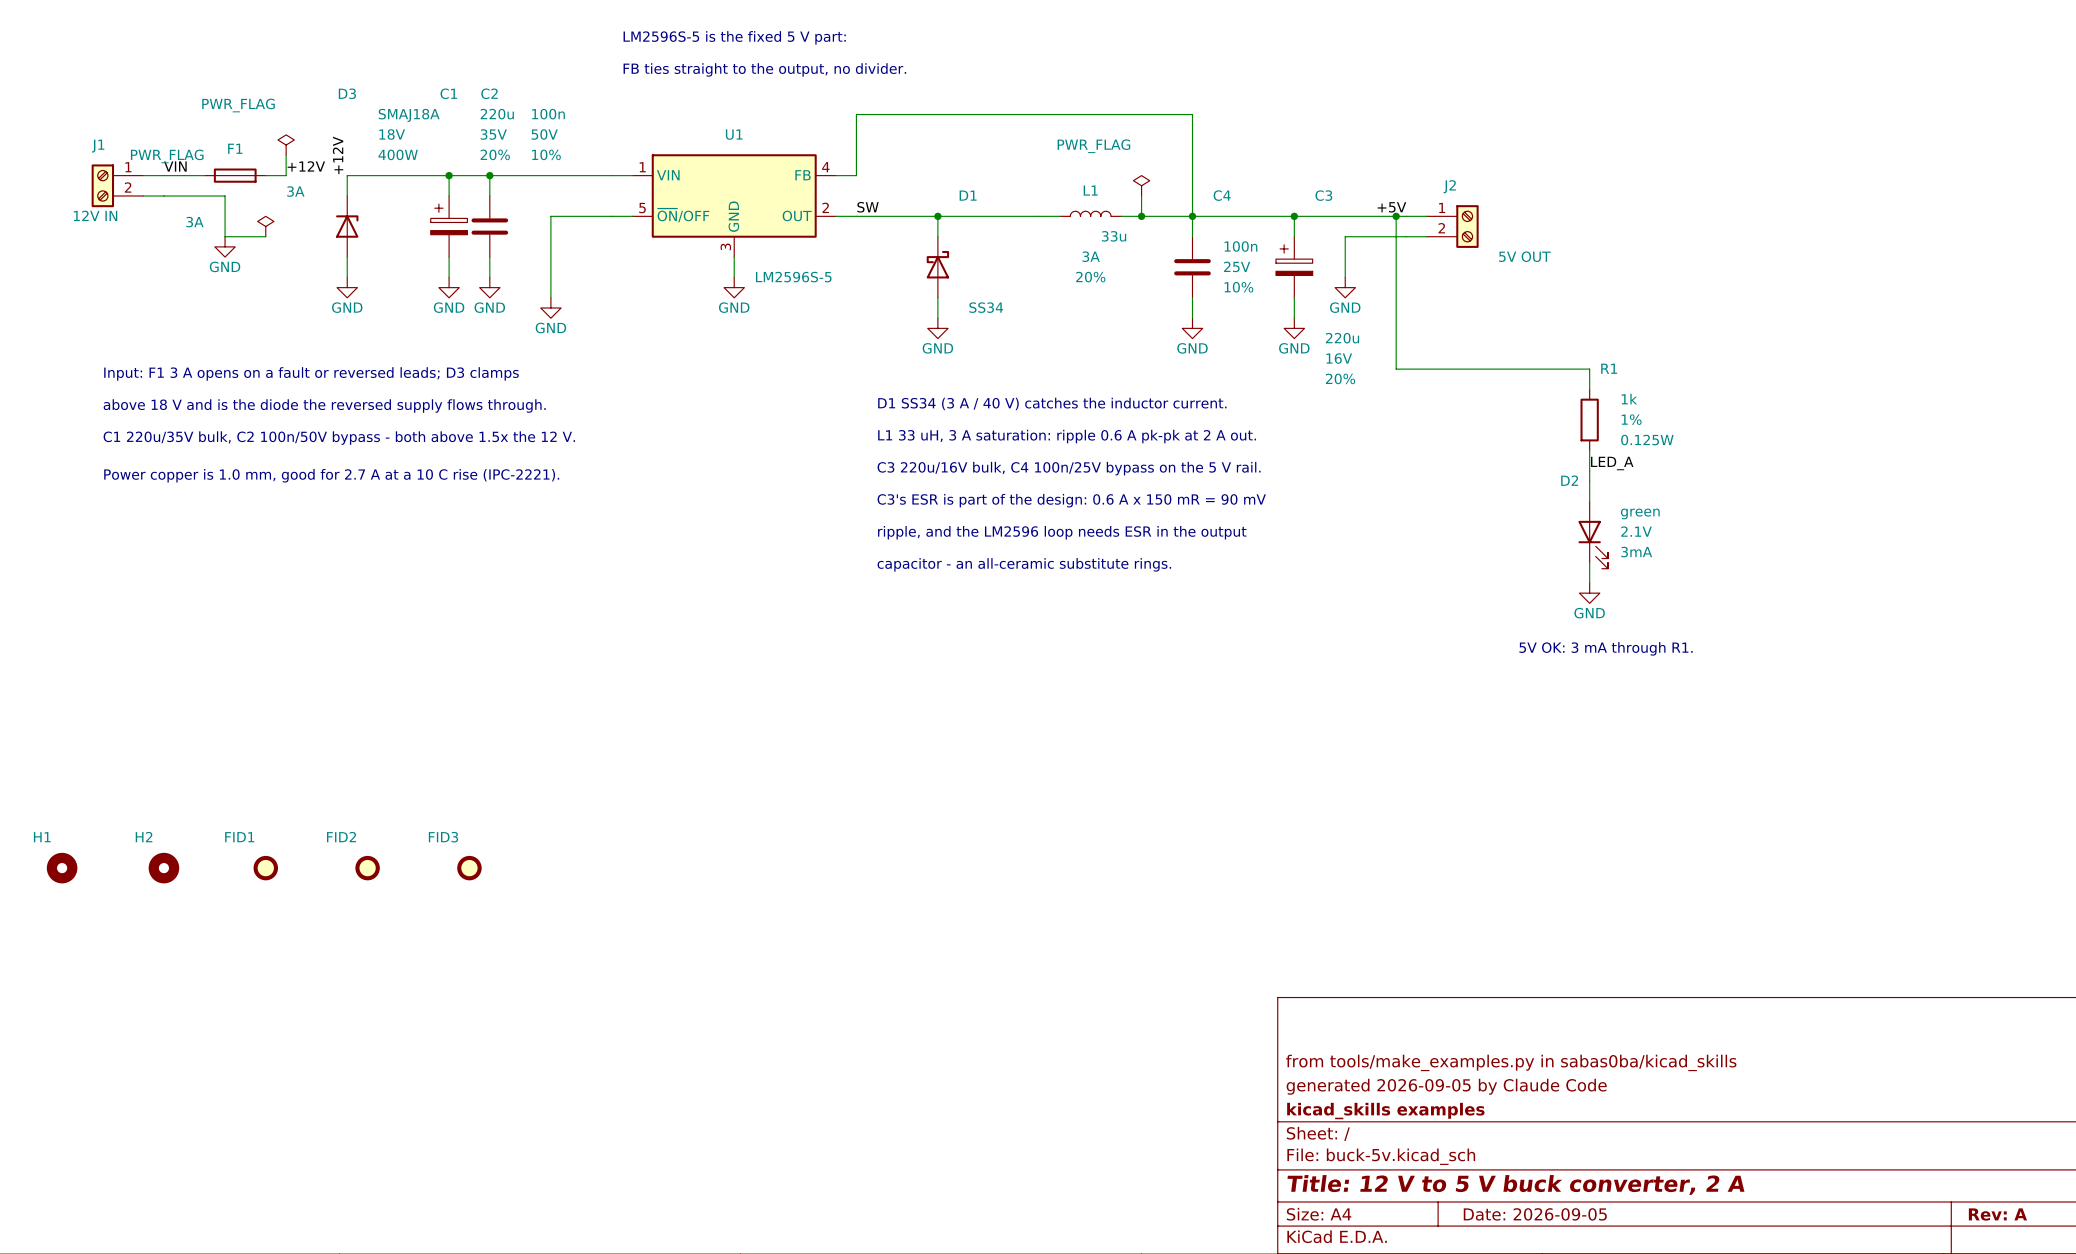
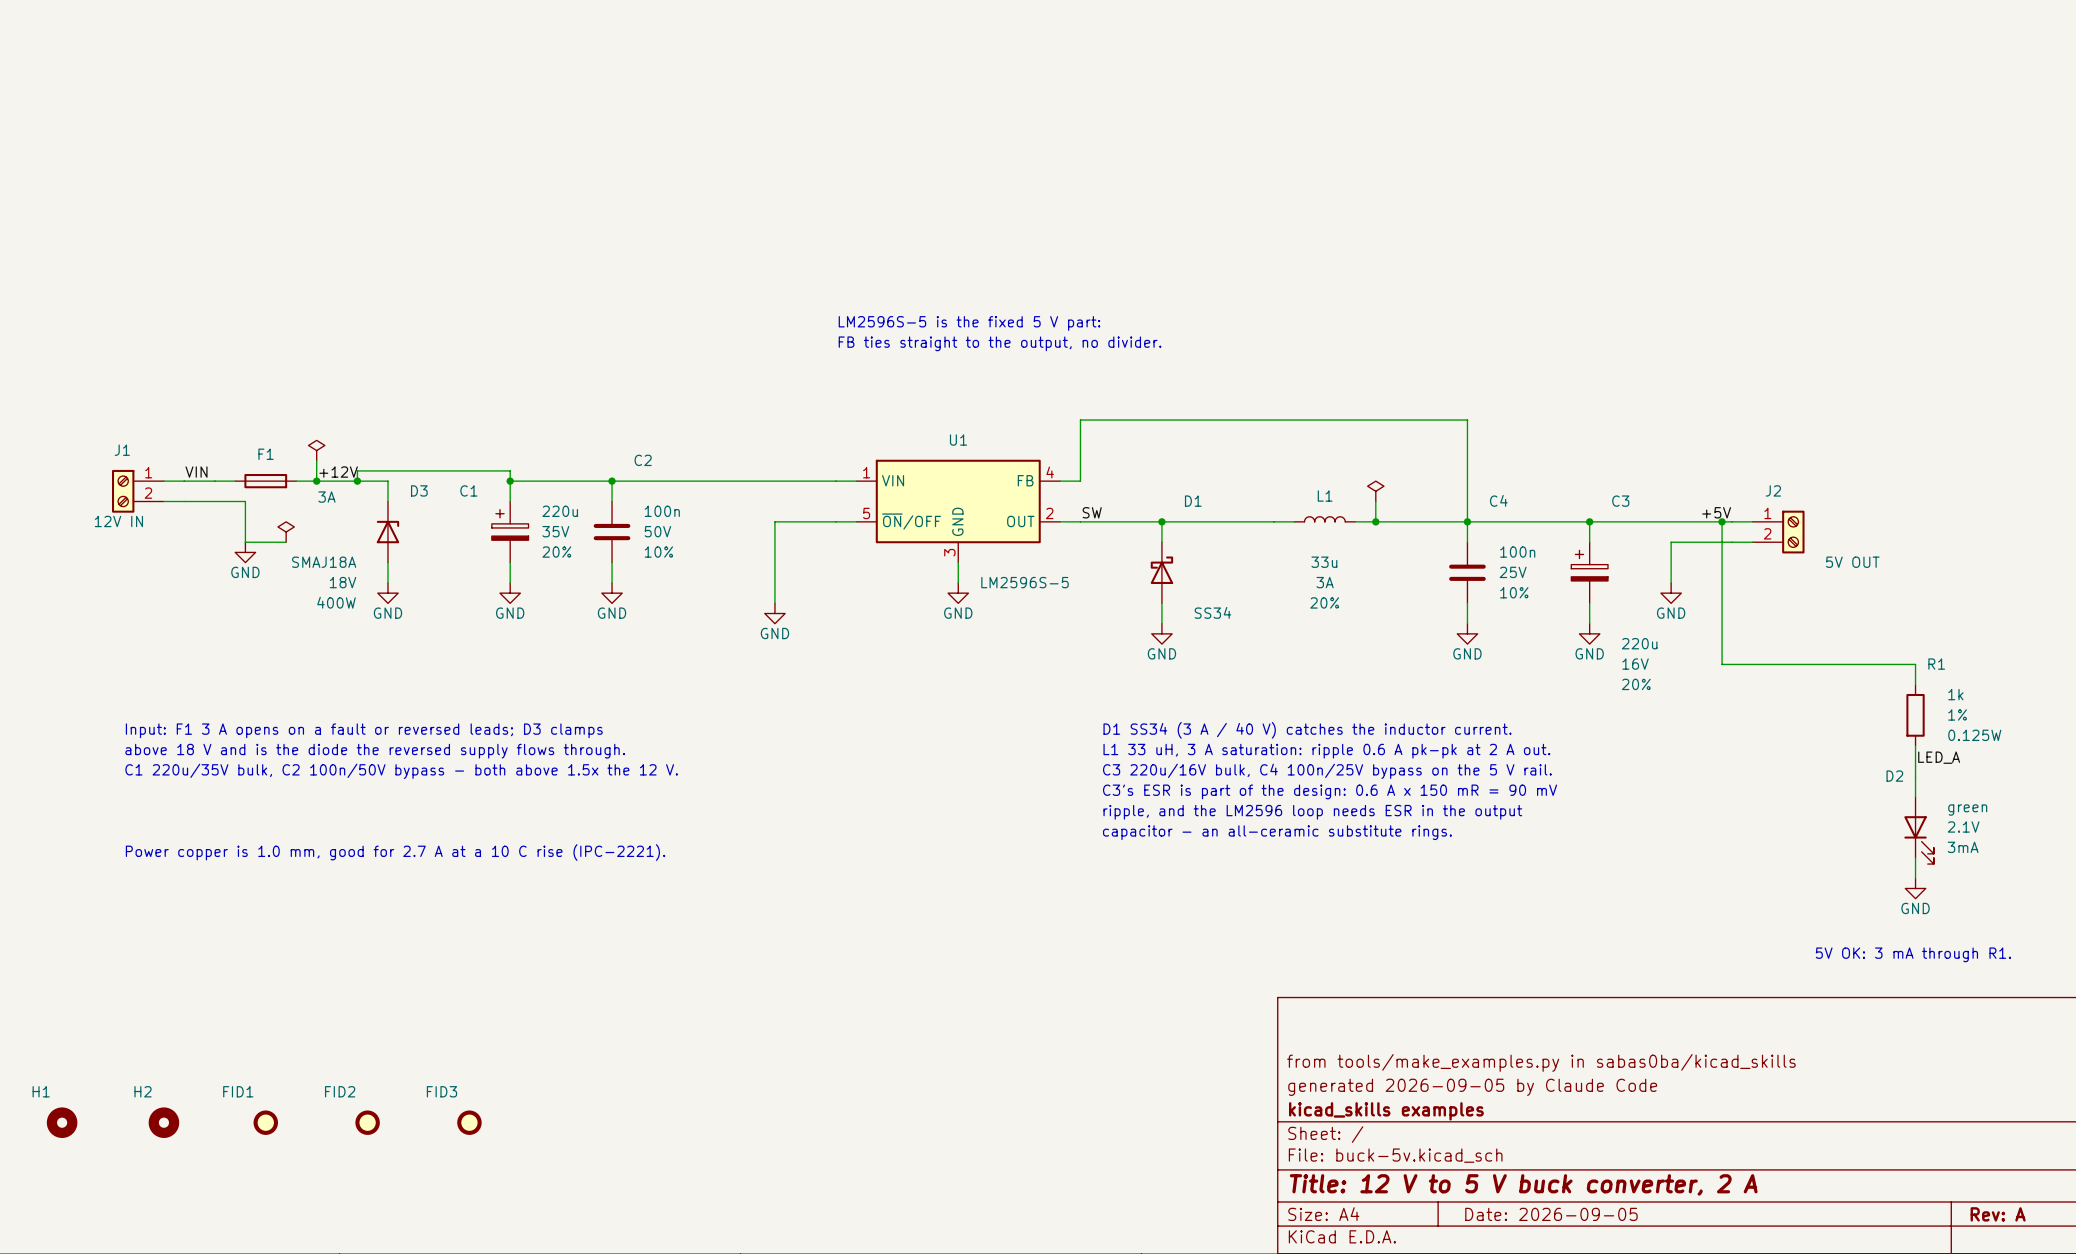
text: LM2596S-5 is the fixed 5 V part: (734, 37) -> none
text: FB ties straight to the output, no divider. (764, 69) -> none
D3 name position: D3 (347, 93) -> D3 (419, 490)
C1 name position: C1 (448, 93) -> C1 (468, 490)
C2 name position: C2 (489, 93) -> C2 (643, 460)
C1 value position: 220u (497, 114) -> 220u (560, 511)
C2 value position: 100n (548, 114) -> 100n (662, 511)
D3 value position: SMAJ18A (409, 115) -> SMAJ18A (324, 562)
D3 text position: 18V (392, 134) -> 18V (343, 582)
C1 text position: 35V (493, 134) -> 35V (555, 531)
C2 text position: 50V (544, 134) -> 50V (657, 531)
power symbol: PWR_FLAG (286, 145) -> none
D3 text position: 400W (398, 154) -> 400W (336, 602)
C1 text position: 20% (495, 154) -> 20% (556, 552)
C2 text position: 10% (546, 154) -> 10% (658, 552)
wire: (286, 155) (286, 175) (265, 175) -> none
label: +12V (338, 155) -> none
label: VIN (175, 166) -> none
label: +12V (306, 166) -> none
wire: (143, 175) (204, 175) -> none
F1 position: (235, 175) -> (265, 481)
wire: (449, 175) (449, 195) -> none
junction: (449, 175) -> none
wire: (489, 175) (489, 195) -> none
junction: (489, 175) -> none
wire: (632, 175) (347, 175) (347, 195) -> none
wire: (836, 175) (856, 175) (856, 114) (1192, 114) (1192, 236) -> none
J1 position: (117, 185) -> (137, 491)
power symbol: PWR_FLAG (1141, 185) -> none
wire: (143, 195) (225, 195) (225, 236) (265, 236) -> none
wire: (1141, 195) (1141, 216) -> none
U1 position: (734, 205) -> (958, 511)
label: SW (868, 207) -> none
label: +5V (1391, 207) -> none
L1 position: (1090, 213) -> (1324, 519)
wire: (632, 216) (550, 216) (550, 297) -> none
wire: (836, 216) (1060, 216) -> none
wire: (937, 216) (937, 236) -> none
junction: (937, 216) -> none
wire: (1121, 216) (1426, 216) -> none
junction: (1141, 216) -> none
junction: (1192, 216) -> none
wire: (1294, 216) (1294, 236) -> none
junction: (1294, 216) -> none
wire: (1396, 216) (1396, 369) (1589, 369) (1589, 389) -> none
junction: (1396, 216) -> none
F1 text: 3A (194, 222) -> none
power symbol: PWR_FLAG (265, 226) -> none
D3 position: (347, 226) -> (387, 532)
C1 position: (449, 226) -> (510, 532)
C2 position: (489, 226) -> (612, 532)
J2 position: (1452, 226) -> (1778, 532)
L1 value position: 33u (1114, 236) -> 33u (1324, 562)
wire: (1426, 236) (1345, 236) (1345, 277) -> none
power symbol: GND (225, 246) -> none
L1 text position: 3A (1091, 256) -> 3A (1325, 582)
wire: (347, 257) (347, 277) -> none
wire: (449, 257) (449, 277) -> none
wire: (489, 257) (489, 277) -> none
wire: (734, 257) (734, 277) -> none
D1 position: (937, 267) -> (1161, 572)
C4 position: (1192, 267) -> (1467, 572)
C3 position: (1294, 267) -> (1589, 572)
L1 text position: 20% (1090, 277) -> 20% (1324, 602)
power symbol: GND (347, 287) -> none
power symbol: GND (449, 287) -> none
power symbol: GND (489, 287) -> none
power symbol: GND (734, 287) -> none
power symbol: GND (1345, 287) -> none
wire: (937, 297) (937, 318) -> none
wire: (1192, 297) (1192, 318) -> none
wire: (1294, 297) (1294, 318) -> none
power symbol: GND (550, 308) -> none
text: none -> LM2596S-5 is the fixed 5 V part: (969, 323)
power symbol: GND (937, 328) -> none
power symbol: GND (1192, 328) -> none
power symbol: GND (1294, 328) -> none
text: none -> FB ties straight to the output, no divider. (1000, 343)
text: Input: F1 3 A opens on a fault or reversed leads; D3 clamps (311, 373) -> none
text: D1 SS34 (3 A / 40 V) catches the inductor current. (1052, 403) -> none
text: above 18 V and is the diode the reversed supply flows through. (324, 405) -> none
R1 position: (1589, 420) -> (1915, 715)
text: L1 33 uH, 3 A saturation: ripple 0.6 A pk-pk at 2 A out. (1067, 436) -> none
text: C1 220u/35V bulk, C2 100n/50V bypass - both above 1.5x the 12 V. (339, 438) -> none
power symbol: none -> (316, 450)
wire: (1589, 450) (1589, 501) -> none
wire: none -> (316, 460) (316, 481)
label: LED_A (1612, 463) -> none
text: C3 220u/16V bulk, C4 100n/25V bypass on the 5 V rail. (1069, 468) -> none
label: none -> +12V (338, 472)
label: none -> VIN (196, 472)
text: Power copper is 1.0 mm, good for 2.7 A at a 10 C rise (IPC-2221). (331, 475) -> none
wire: none -> (163, 481) (235, 481)
wire: none -> (296, 481) (387, 481) (387, 501)
junction: none -> (316, 481)
wire: none -> (357, 481) (357, 470) (510, 470) (510, 501)
junction: none -> (357, 481)
wire: none -> (510, 481) (856, 481)
junction: none -> (510, 481)
wire: none -> (612, 481) (612, 501)
junction: none -> (612, 481)
wire: none -> (1060, 481) (1080, 481) (1080, 420) (1467, 420) (1467, 542)
power symbol: none -> (1375, 491)
text: C3's ESR is part of the design: 0.6 A x 150 mR = 90 mV (1071, 500) -> none
wire: none -> (163, 501) (245, 501) (245, 542) (286, 542)
wire: none -> (1375, 501) (1375, 521)
label: none -> SW (1092, 512)
label: none -> +5V (1716, 512)
wire: none -> (856, 521) (774, 521) (774, 603)
wire: none -> (1060, 521) (1294, 521)
wire: none -> (1161, 521) (1161, 542)
junction: none -> (1161, 521)
wire: none -> (1355, 521) (1752, 521)
junction: none -> (1375, 521)
junction: none -> (1467, 521)
junction: none -> (1589, 521)
wire: none -> (1722, 521) (1722, 664) (1915, 664) (1915, 684)
junction: none -> (1722, 521)
power symbol: none -> (286, 532)
text: ripple, and the LM2596 loop needs ESR in the output (1062, 532) -> none
D2 position: (1593, 535) -> (1919, 830)
wire: none -> (1752, 542) (1671, 542) (1671, 582)
power symbol: none -> GND (245, 552)
wire: none -> (387, 562) (387, 582)
wire: none -> (510, 562) (510, 582)
wire: none -> (612, 562) (612, 582)
wire: none -> (958, 562) (958, 582)
text: capacitor - an all-ceramic substitute rings. (1024, 564) -> none
power symbol: none -> GND (387, 593)
power symbol: none -> GND (510, 593)
power symbol: none -> GND (612, 593)
power symbol: none -> GND (958, 593)
power symbol: GND (1589, 593) -> none
power symbol: none -> GND (1671, 593)
wire: none -> (1161, 603) (1161, 623)
wire: none -> (1467, 603) (1467, 623)
wire: none -> (1589, 603) (1589, 623)
power symbol: none -> GND (774, 613)
power symbol: none -> GND (1161, 633)
power symbol: none -> GND (1467, 633)
power symbol: none -> GND (1589, 633)
text: 5V OK: 3 mA through R1. (1606, 648) -> none
text: none -> D1 SS34 (3 A / 40 V) catches the inductor current. (1307, 730)
text: none -> Input: F1 3 A opens on a fault or reversed leads; D3 clamps (364, 730)
wire: none -> (1915, 745) (1915, 796)
text: none -> above 18 V and is the diode the reversed supply flows through. (375, 751)
text: none -> L1 33 uH, 3 A saturation: ripple 0.6 A pk-pk at 2 A out. (1326, 751)
label: none -> LED_A (1939, 757)
text: none -> C1 220u/35V bulk, C2 100n/50V bypass - both above 1.5x the 12 V. (401, 771)
text: none -> C3 220u/16V bulk, C4 100n/25V bypass on the 5 V rail. (1327, 771)
text: none -> C3's ESR is part of the design: 0.6 A x 150 mR = 90 mV (1330, 791)
text: none -> ripple, and the LM2596 loop needs ESR in the output (1312, 812)
text: none -> capacitor - an all-ceramic substitute rings. (1277, 832)
text: none -> Power copper is 1.0 mm, good for 2.7 A at a 10 C rise (IPC-2221). (395, 852)
wire: none -> (1915, 857) (1915, 878)
H1 position: (62, 868) -> (62, 1122)
H2 position: (163, 868) -> (163, 1122)
FID1 position: (265, 868) -> (265, 1122)
FID2 position: (367, 868) -> (367, 1122)
FID3 position: (469, 868) -> (469, 1122)
power symbol: none -> GND (1915, 888)
text: none -> 5V OK: 3 mA through R1. (1913, 954)

